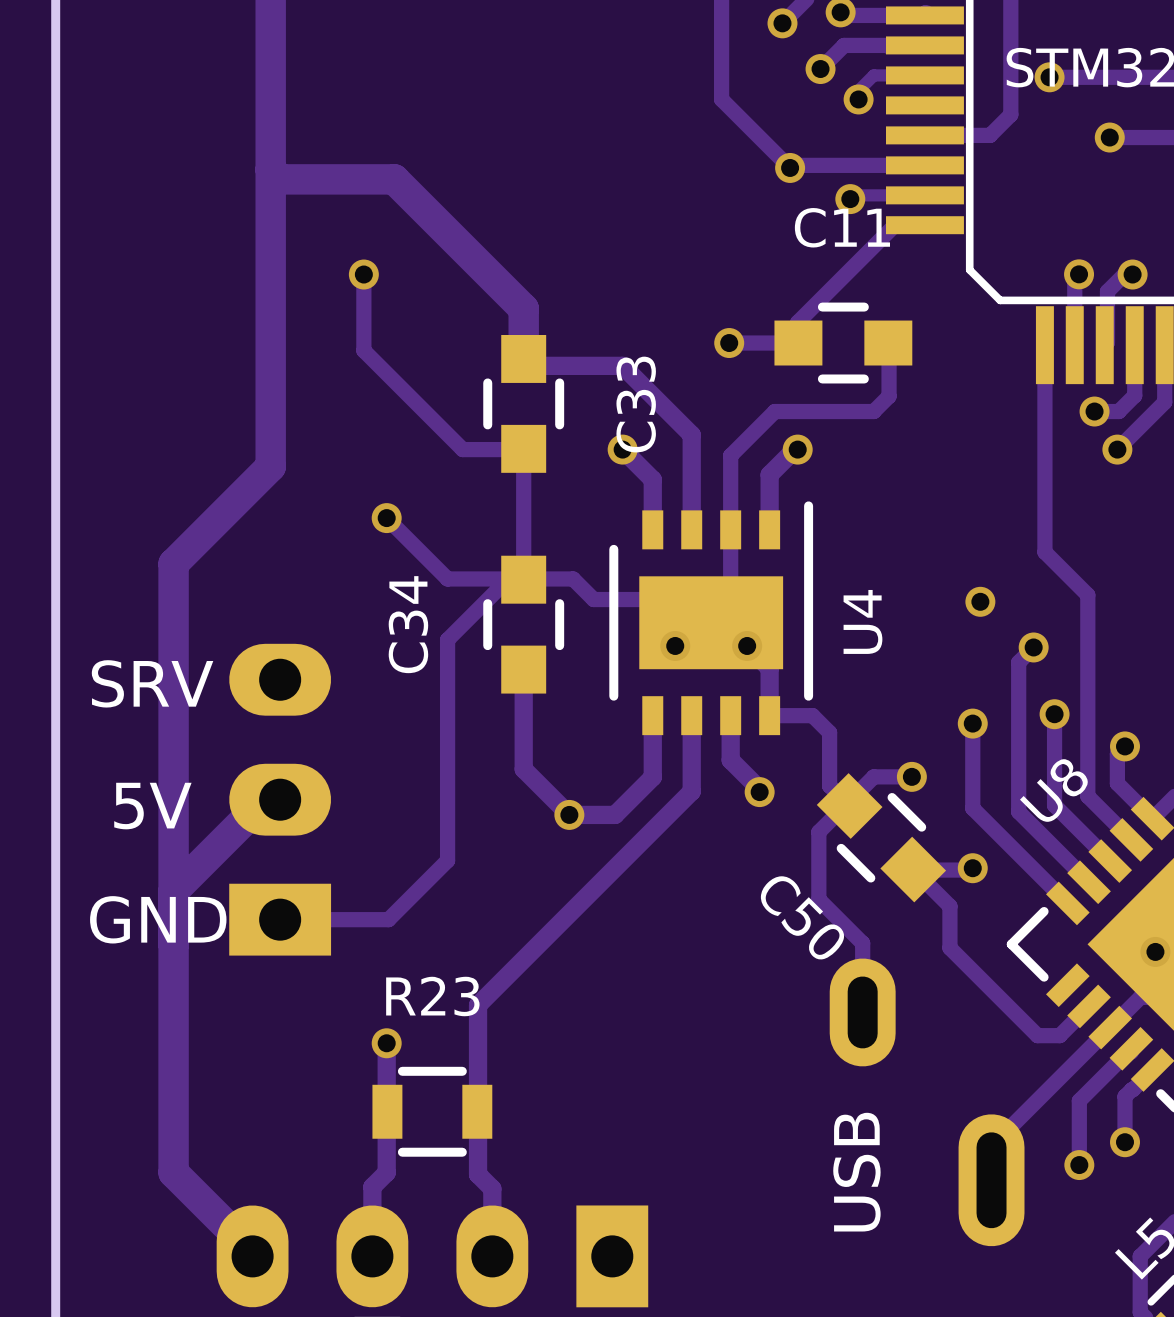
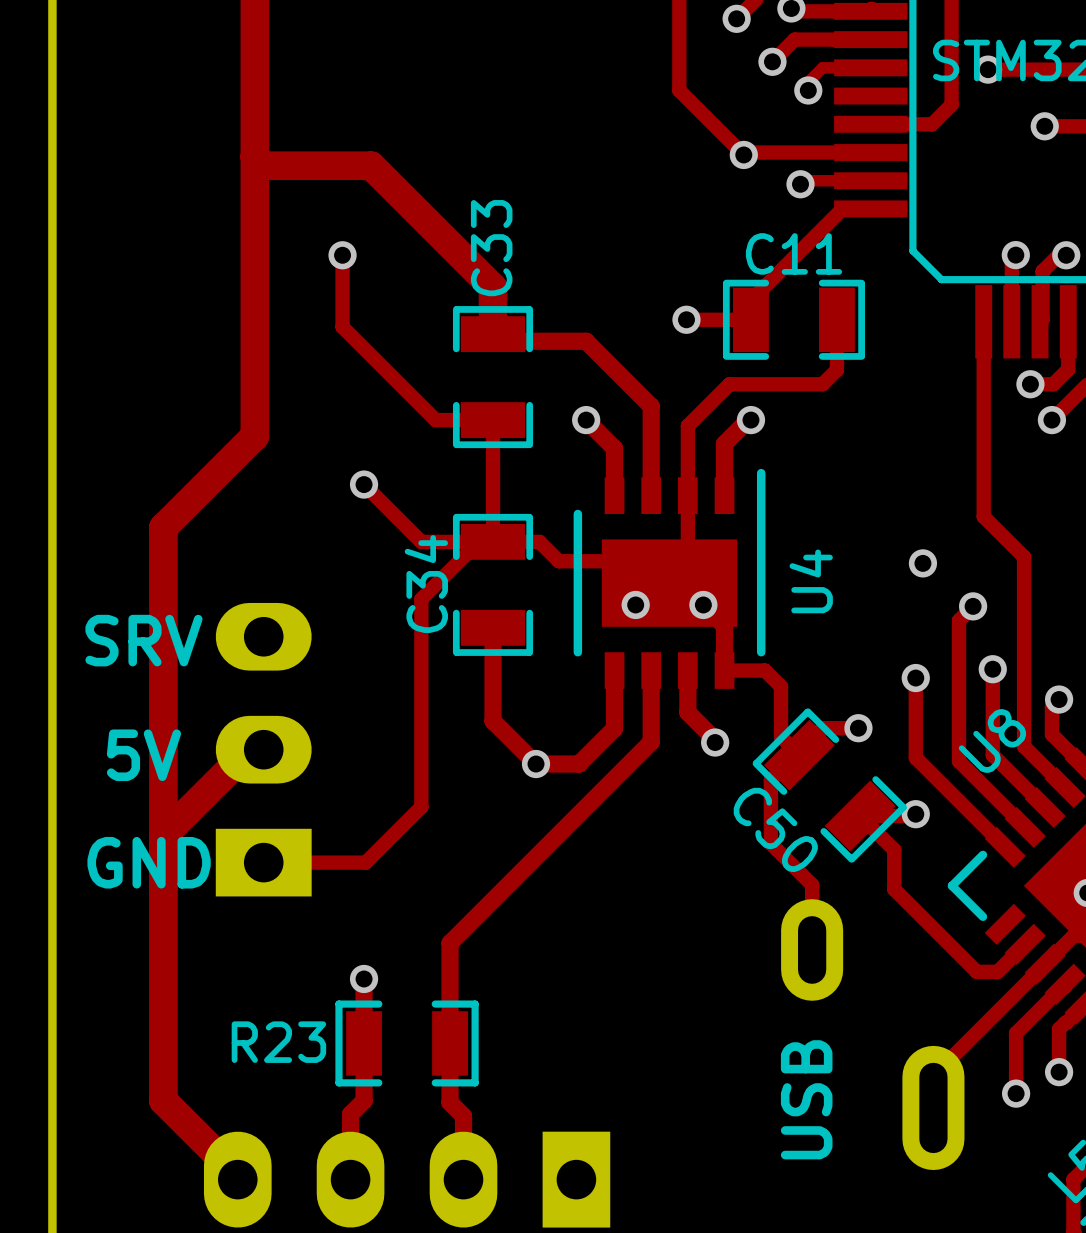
C11 footprint: [774, 302, 913, 384] -> [722, 279, 865, 360]
C33 footprint: [483, 334, 565, 473] -> [452, 306, 534, 449]
C33 name position: C33 (636, 404) -> C33 (491, 248)
C34 footprint: [483, 555, 565, 694] -> [452, 513, 534, 656]
C50 footprint: [816, 773, 947, 903] -> [752, 708, 907, 863]
R23 name position: R23 (432, 996) -> R23 (278, 1042)
R23 footprint: [372, 1066, 493, 1157] -> [335, 1000, 479, 1087]

